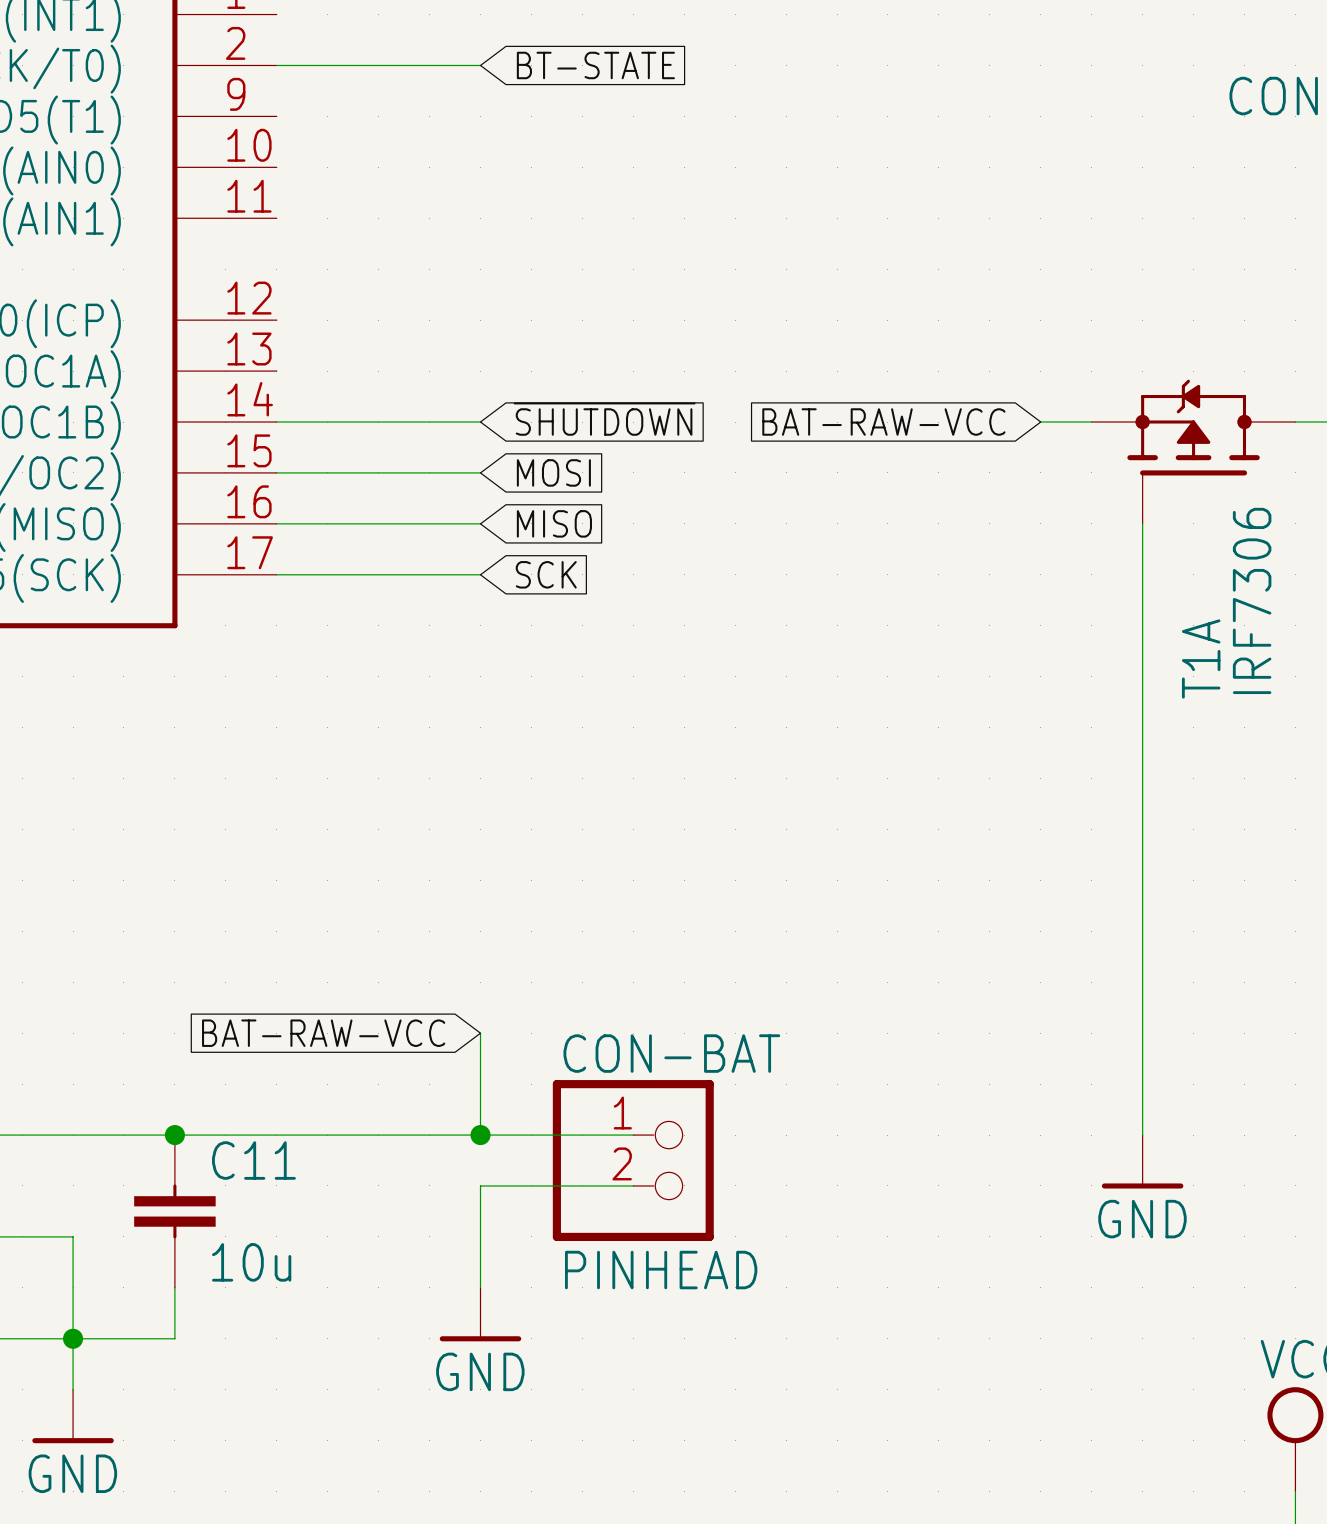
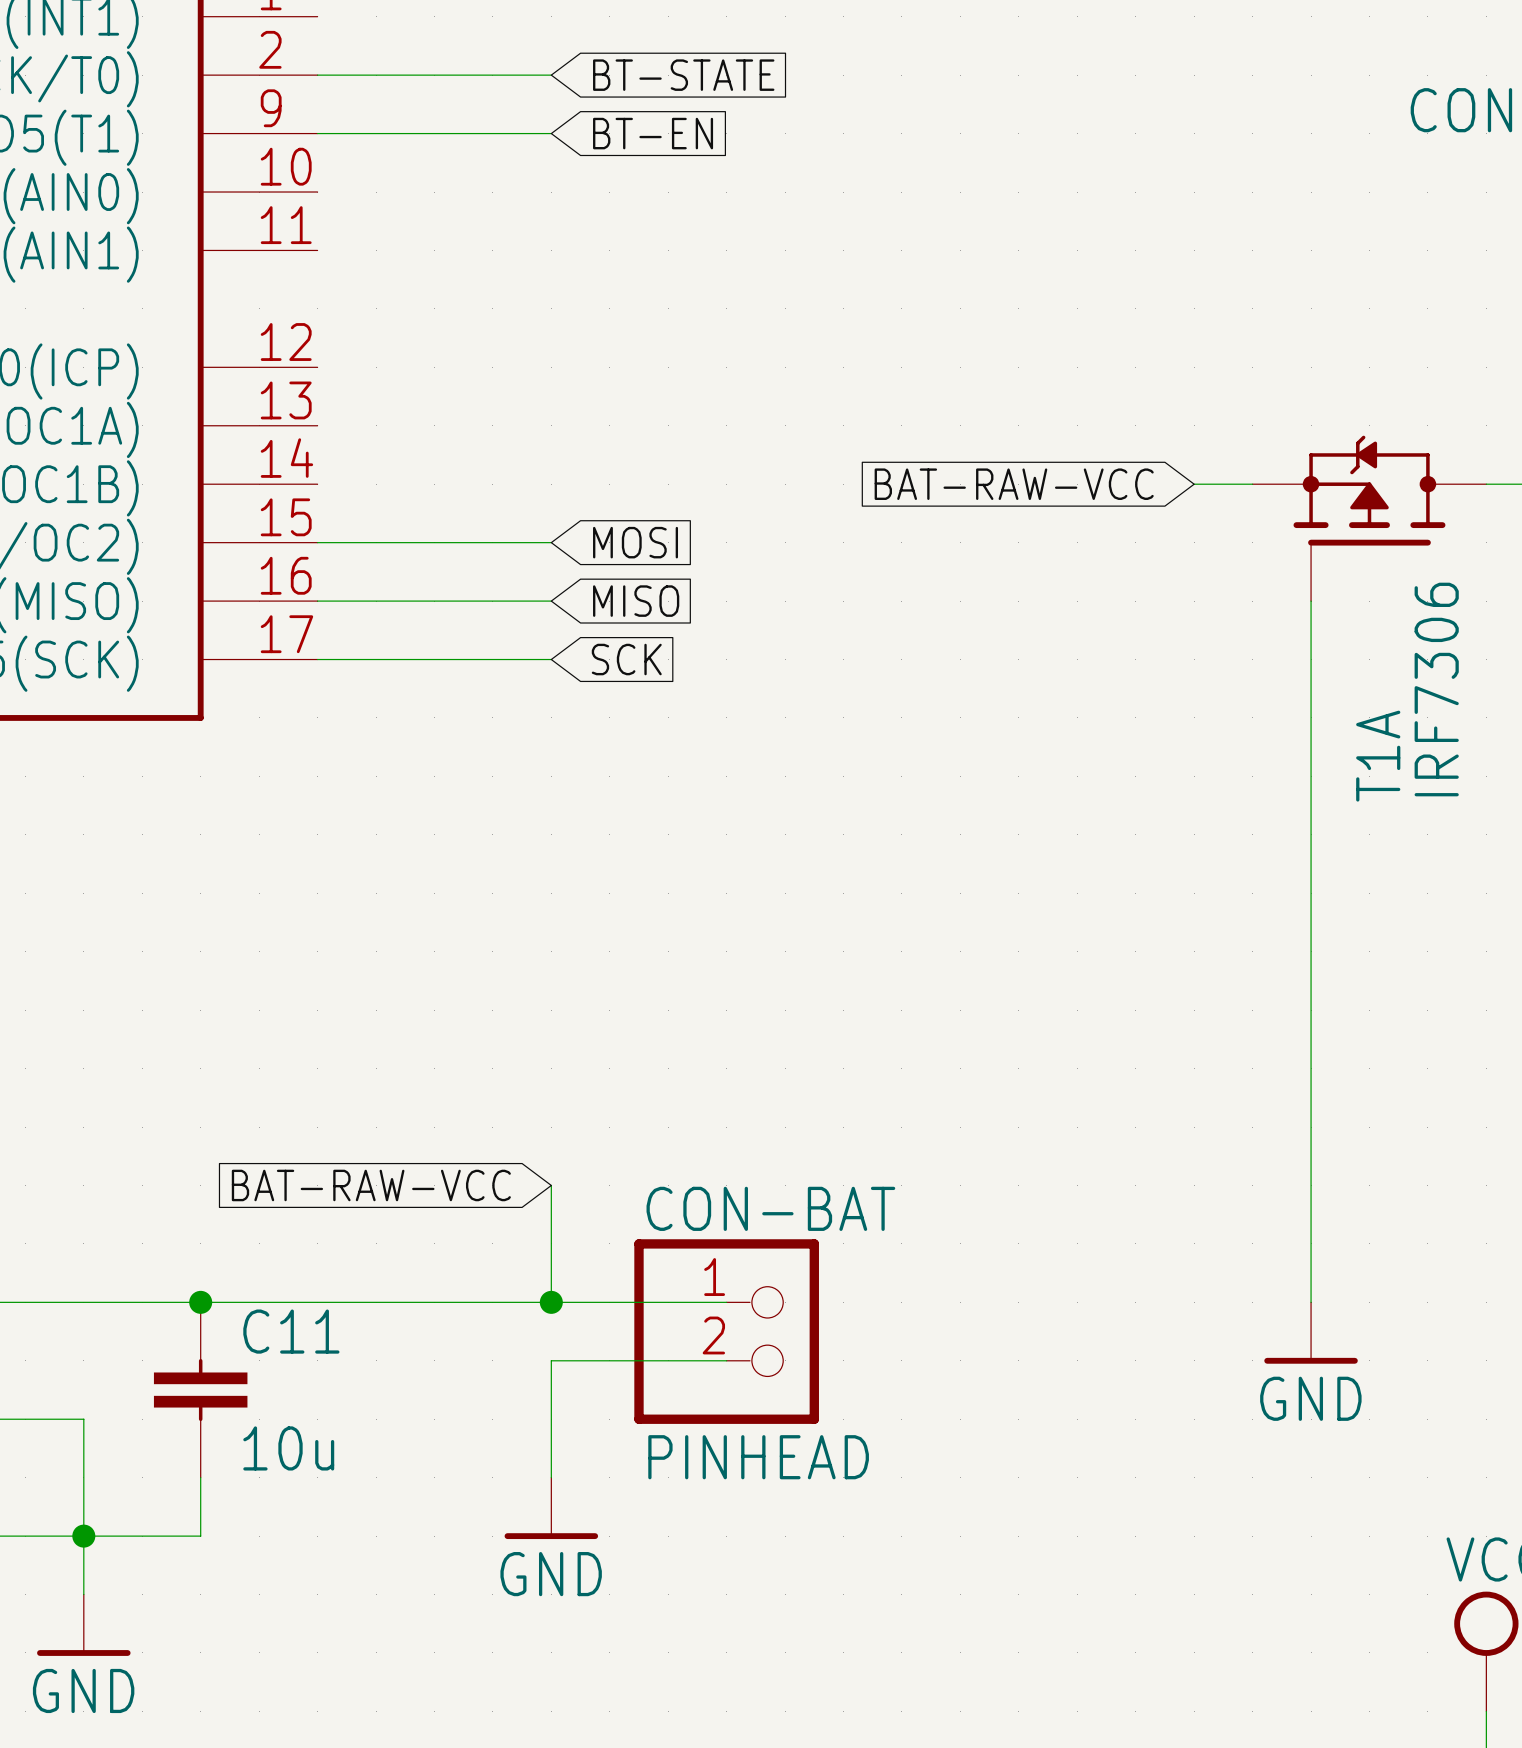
global label: none -> BT-EN (653, 133)
global label: ~{SHUTDOWN} (604, 419) -> none
wire: (276, 422) (480, 422) -> (317, 133) (551, 133)

